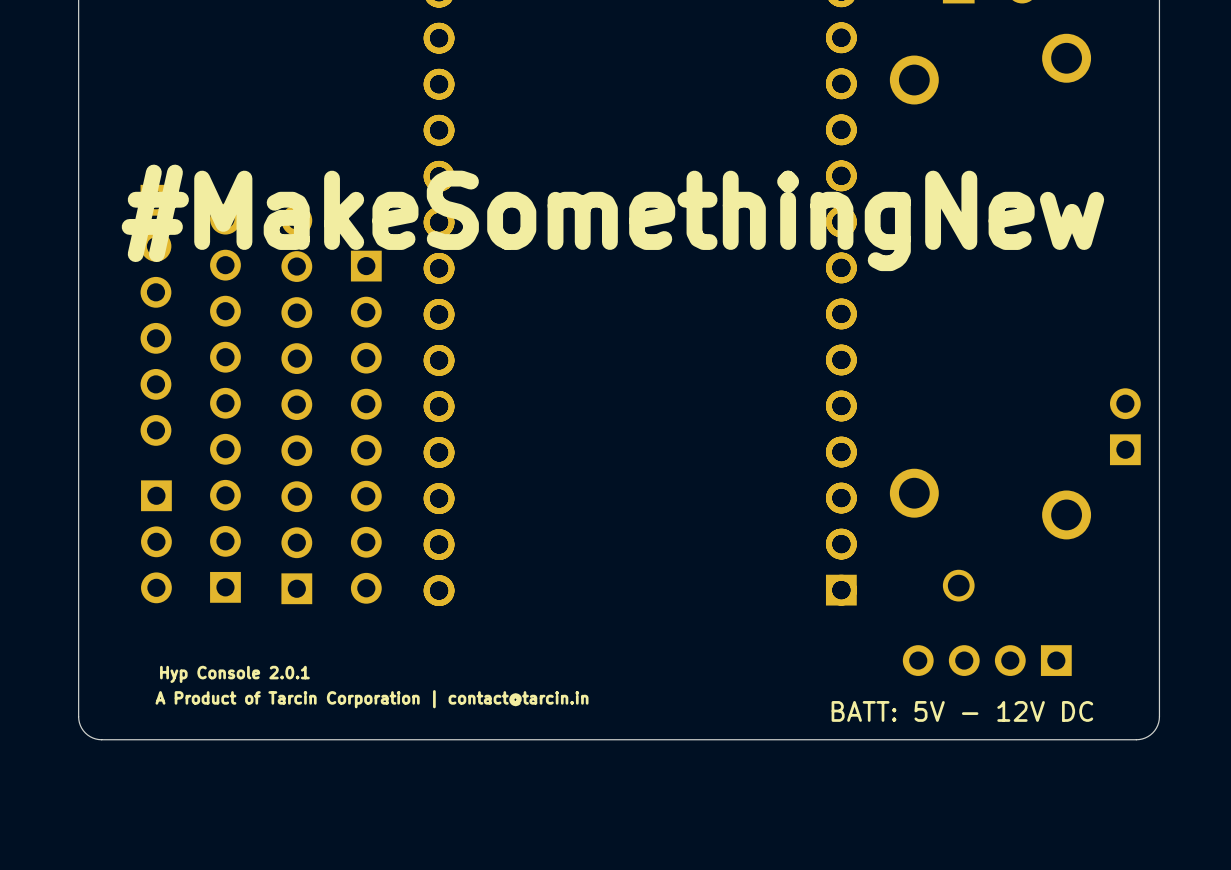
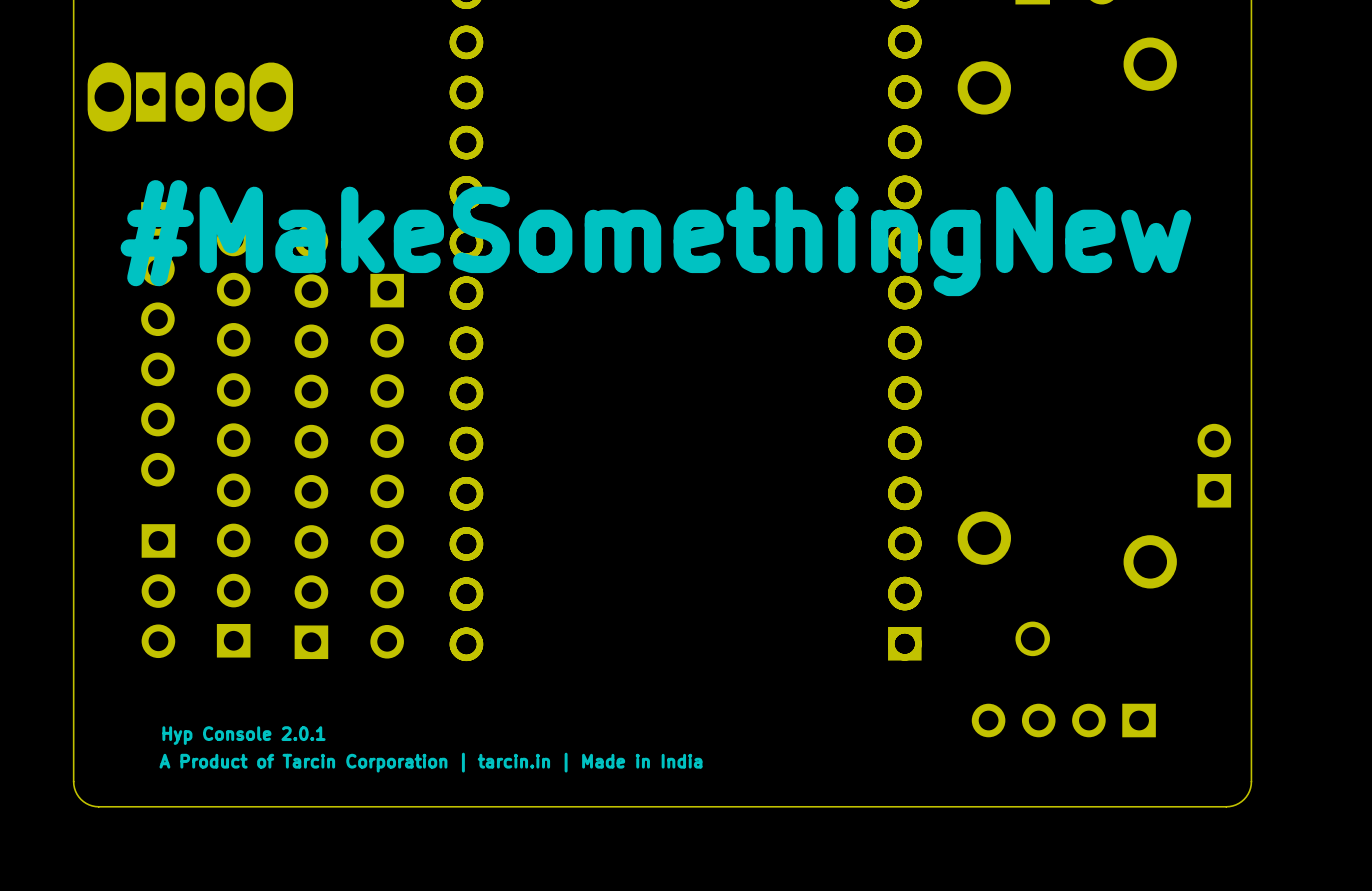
part: none -> (190, 97)
text: A Product of Tarcin Corporation | contact@tarcin.in (372, 699) -> A Product of Tarcin Corporation | tarcin.in | Made in India (430, 762)
text: BATT: 5V - 12V DC (962, 711) -> none

